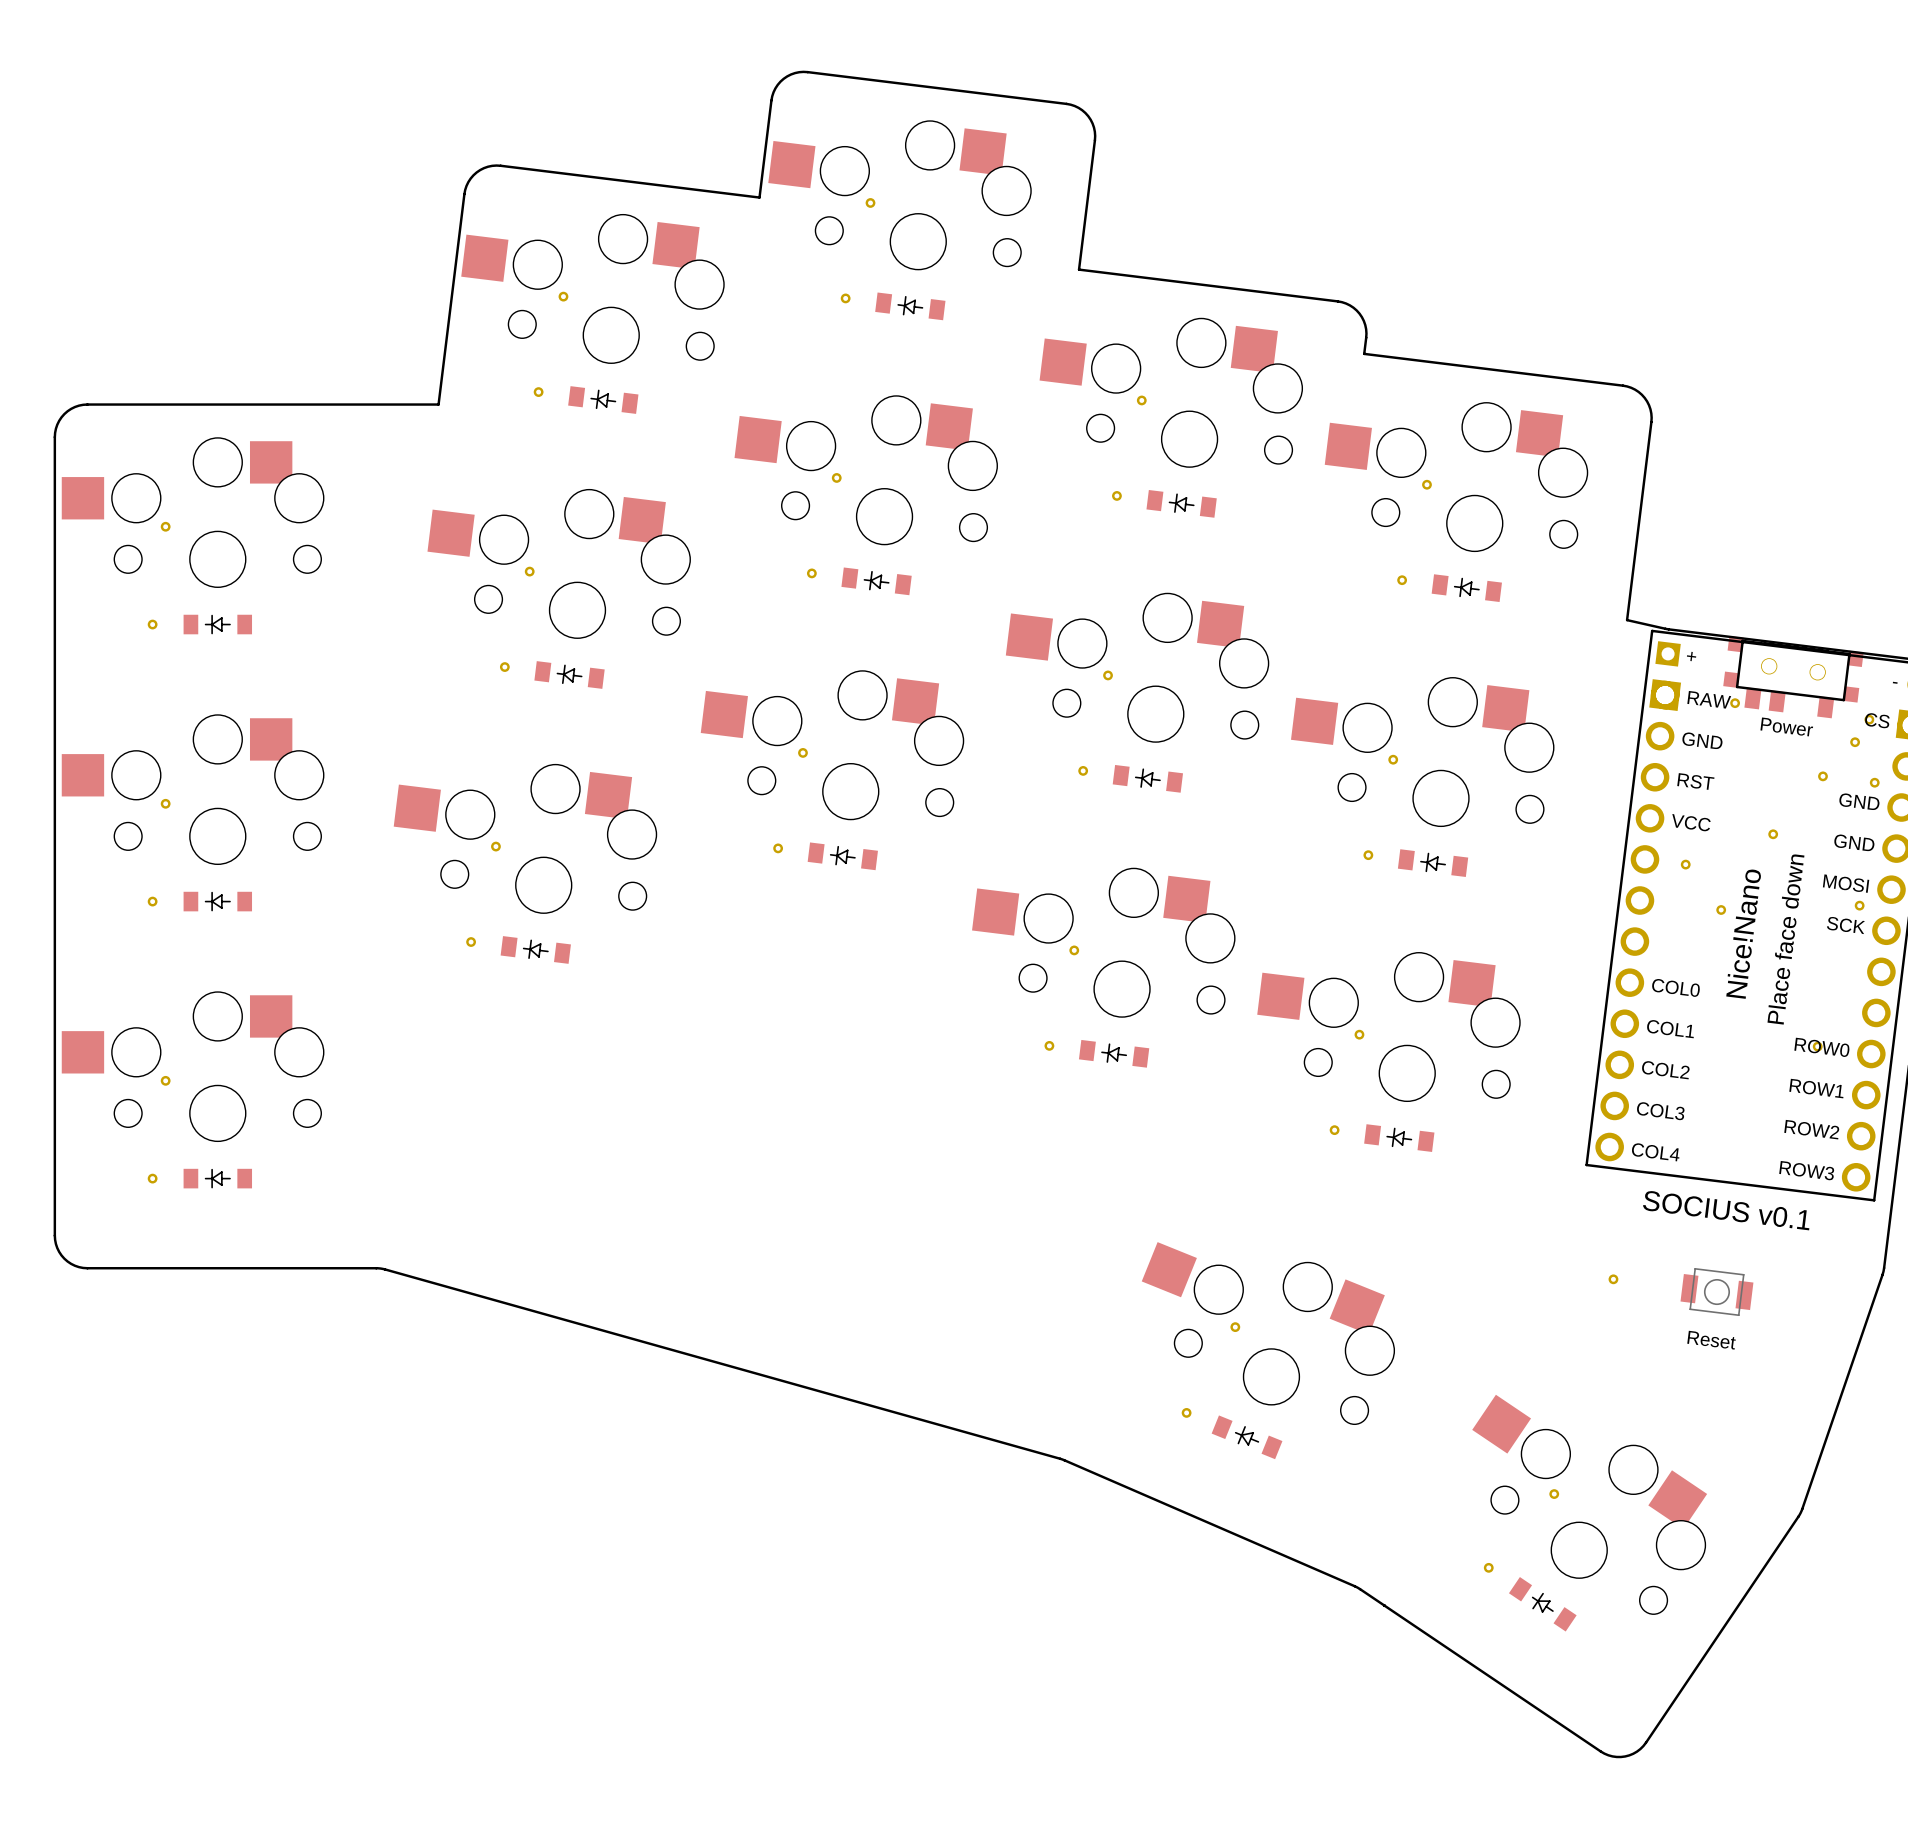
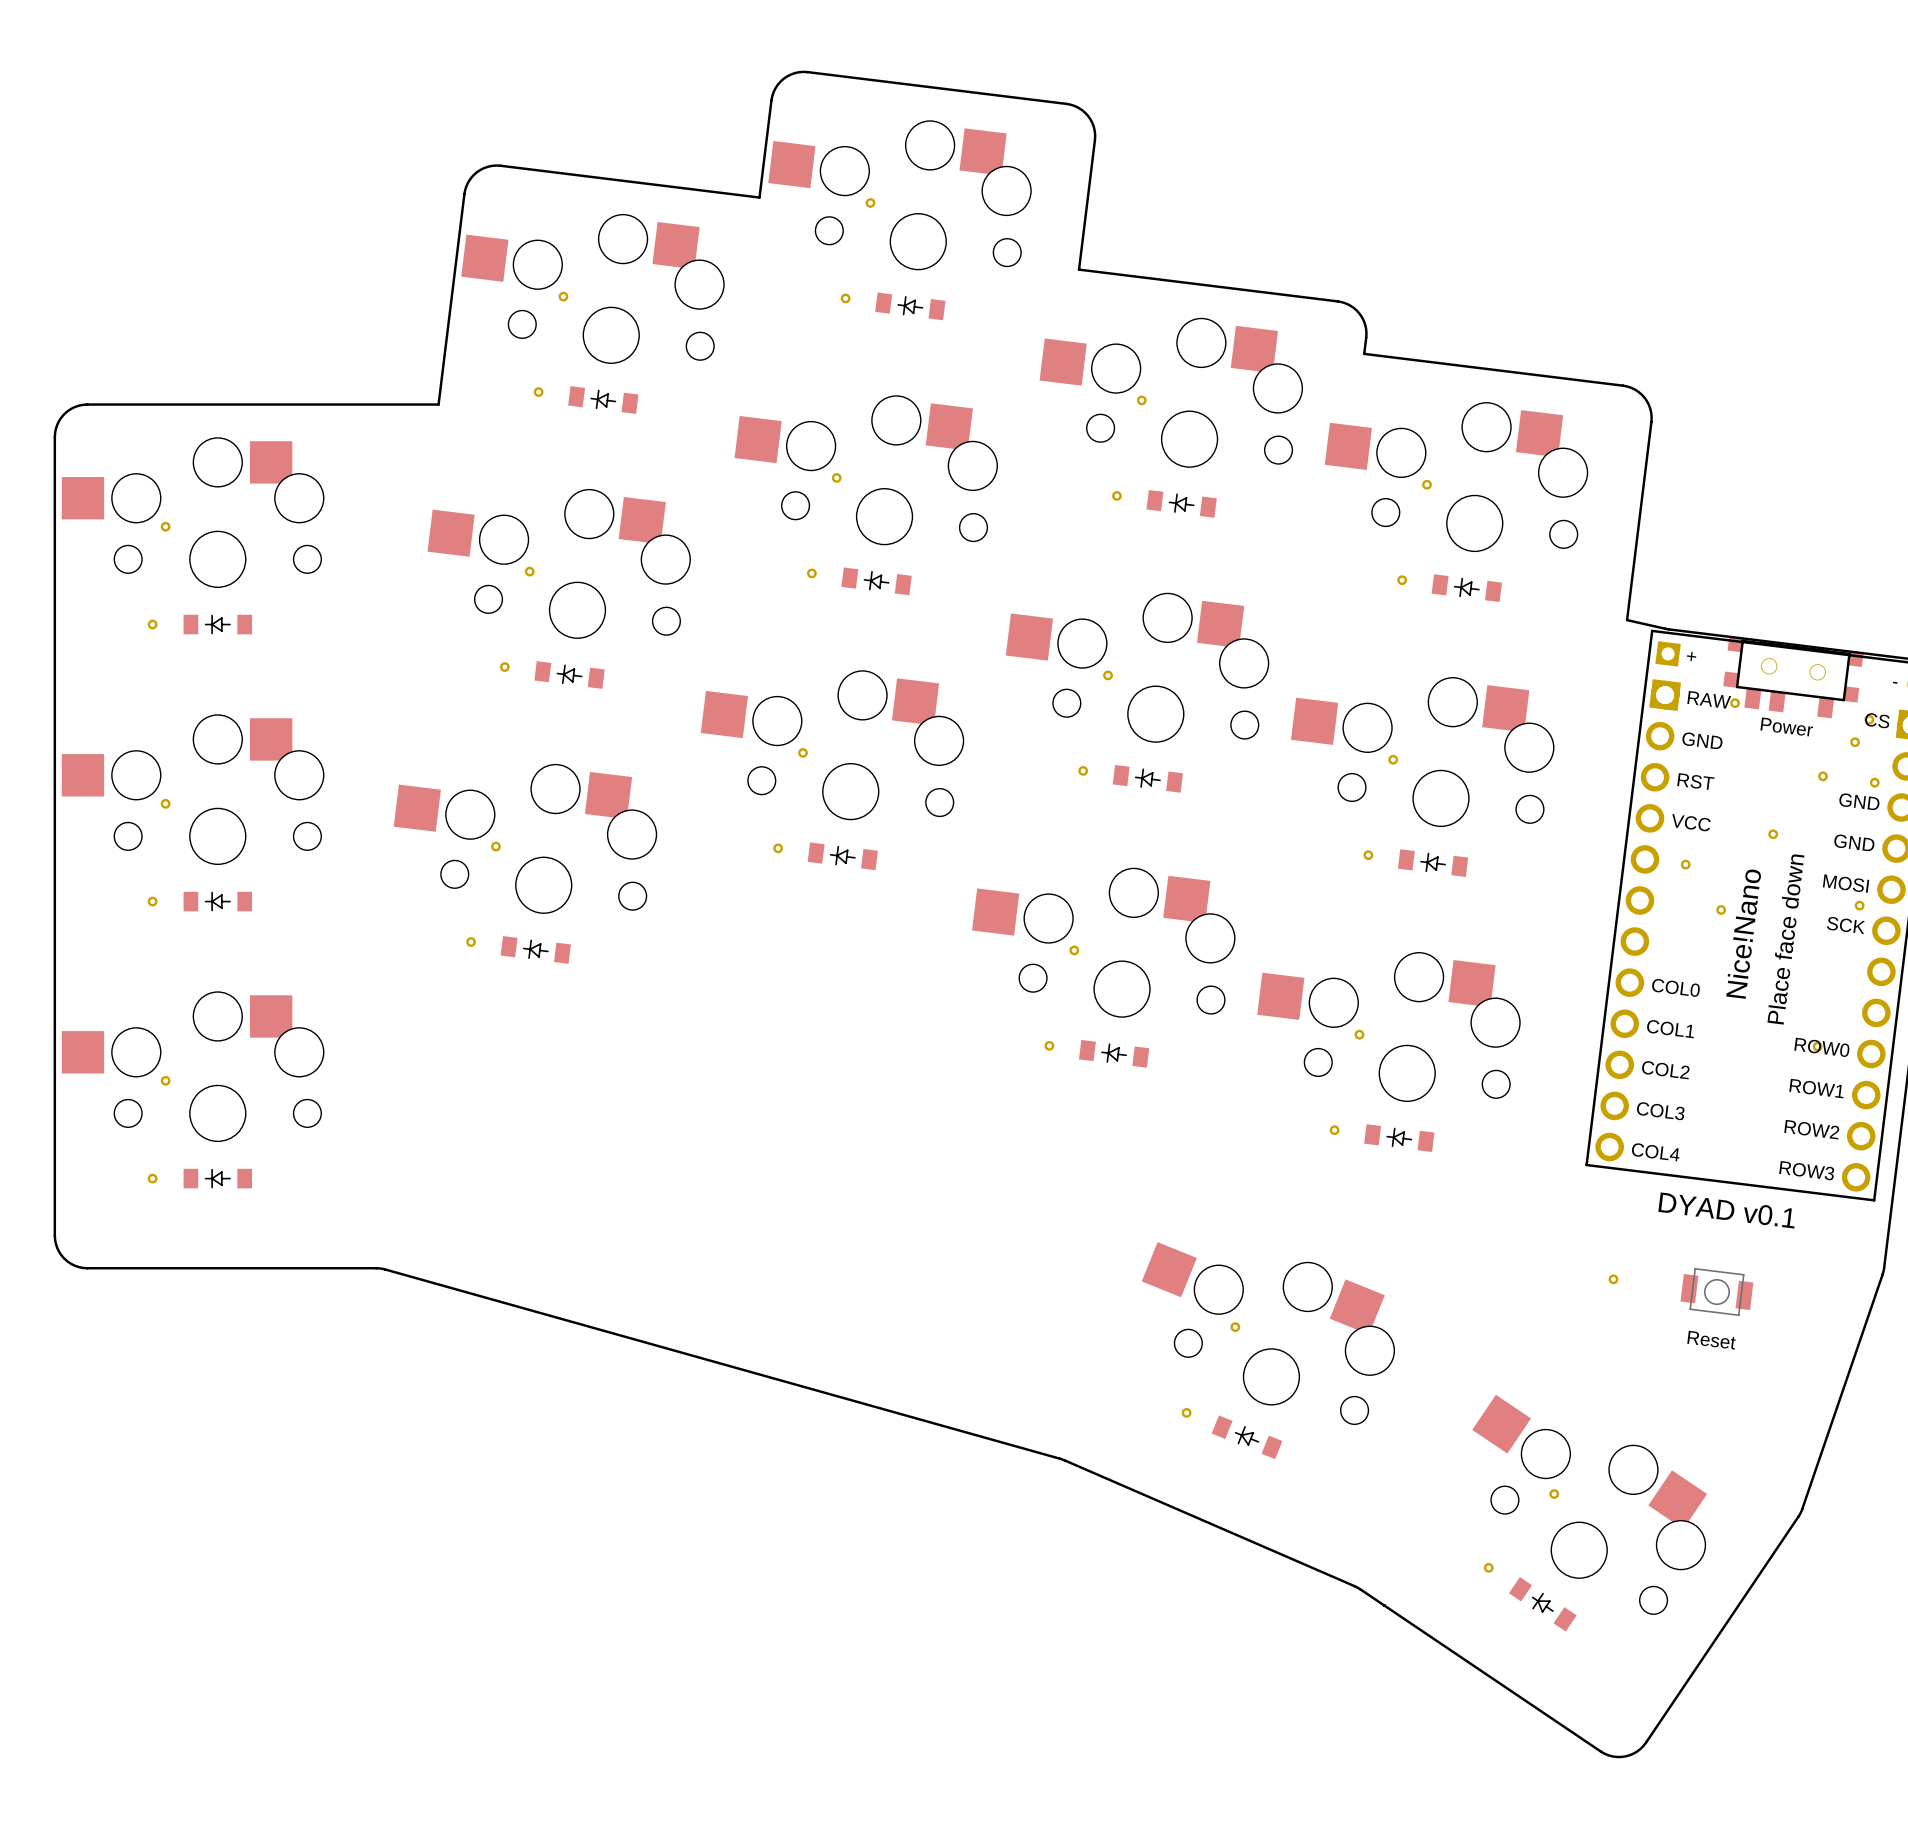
part text: SOCIUS v0.1 (1726, 1210) -> DYAD v0.1 (1726, 1210)

